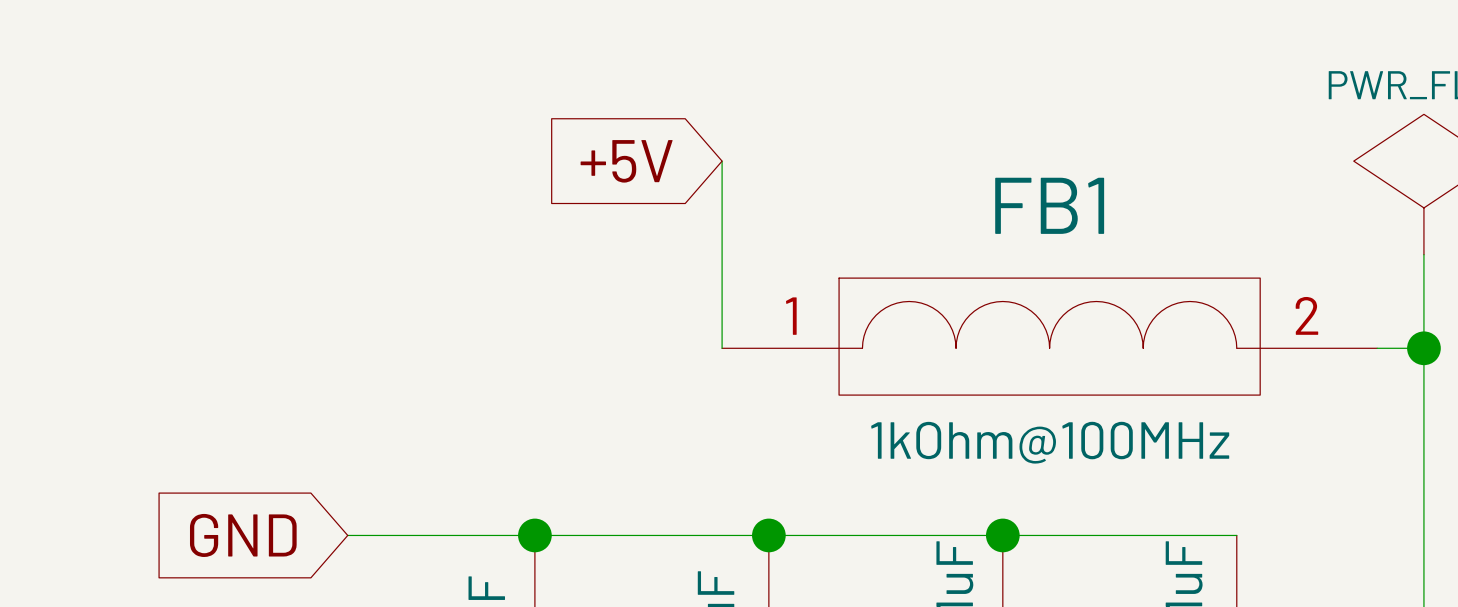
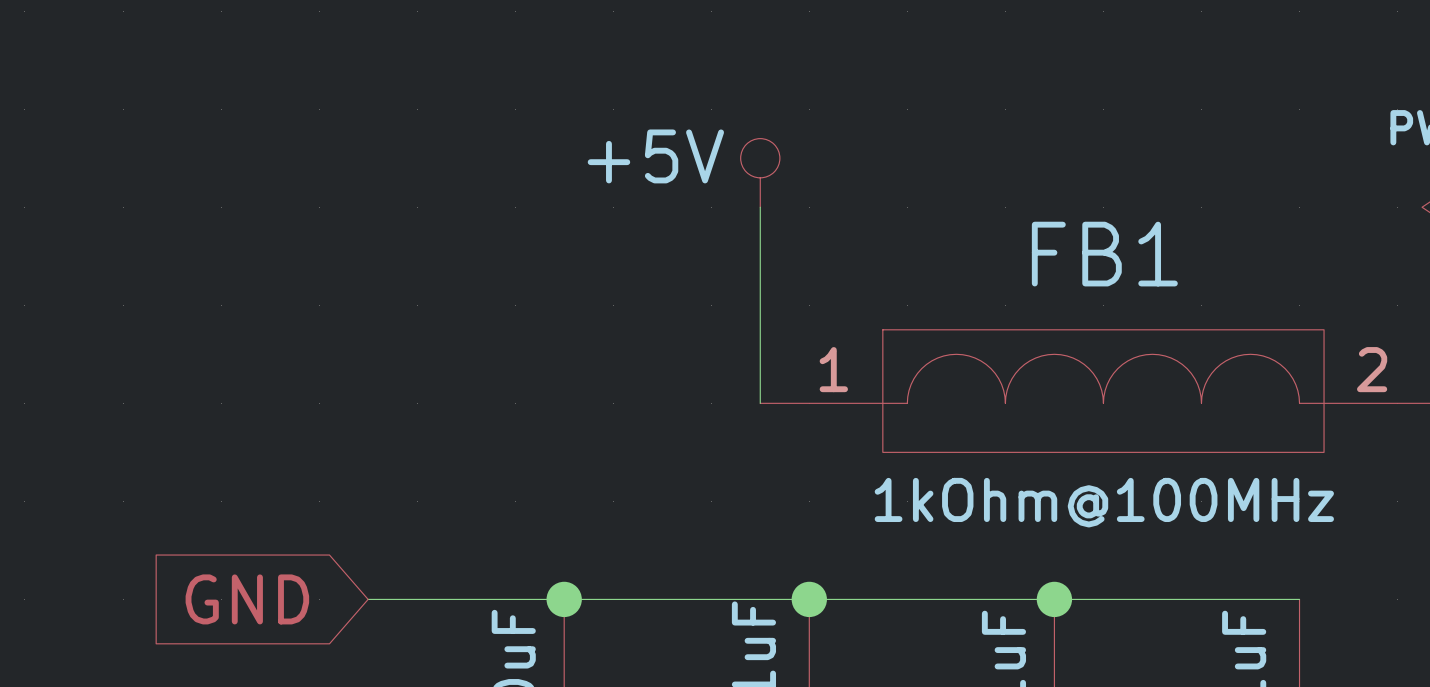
power symbol: none -> +5V (760, 172)
global label: +5V (626, 161) -> none

